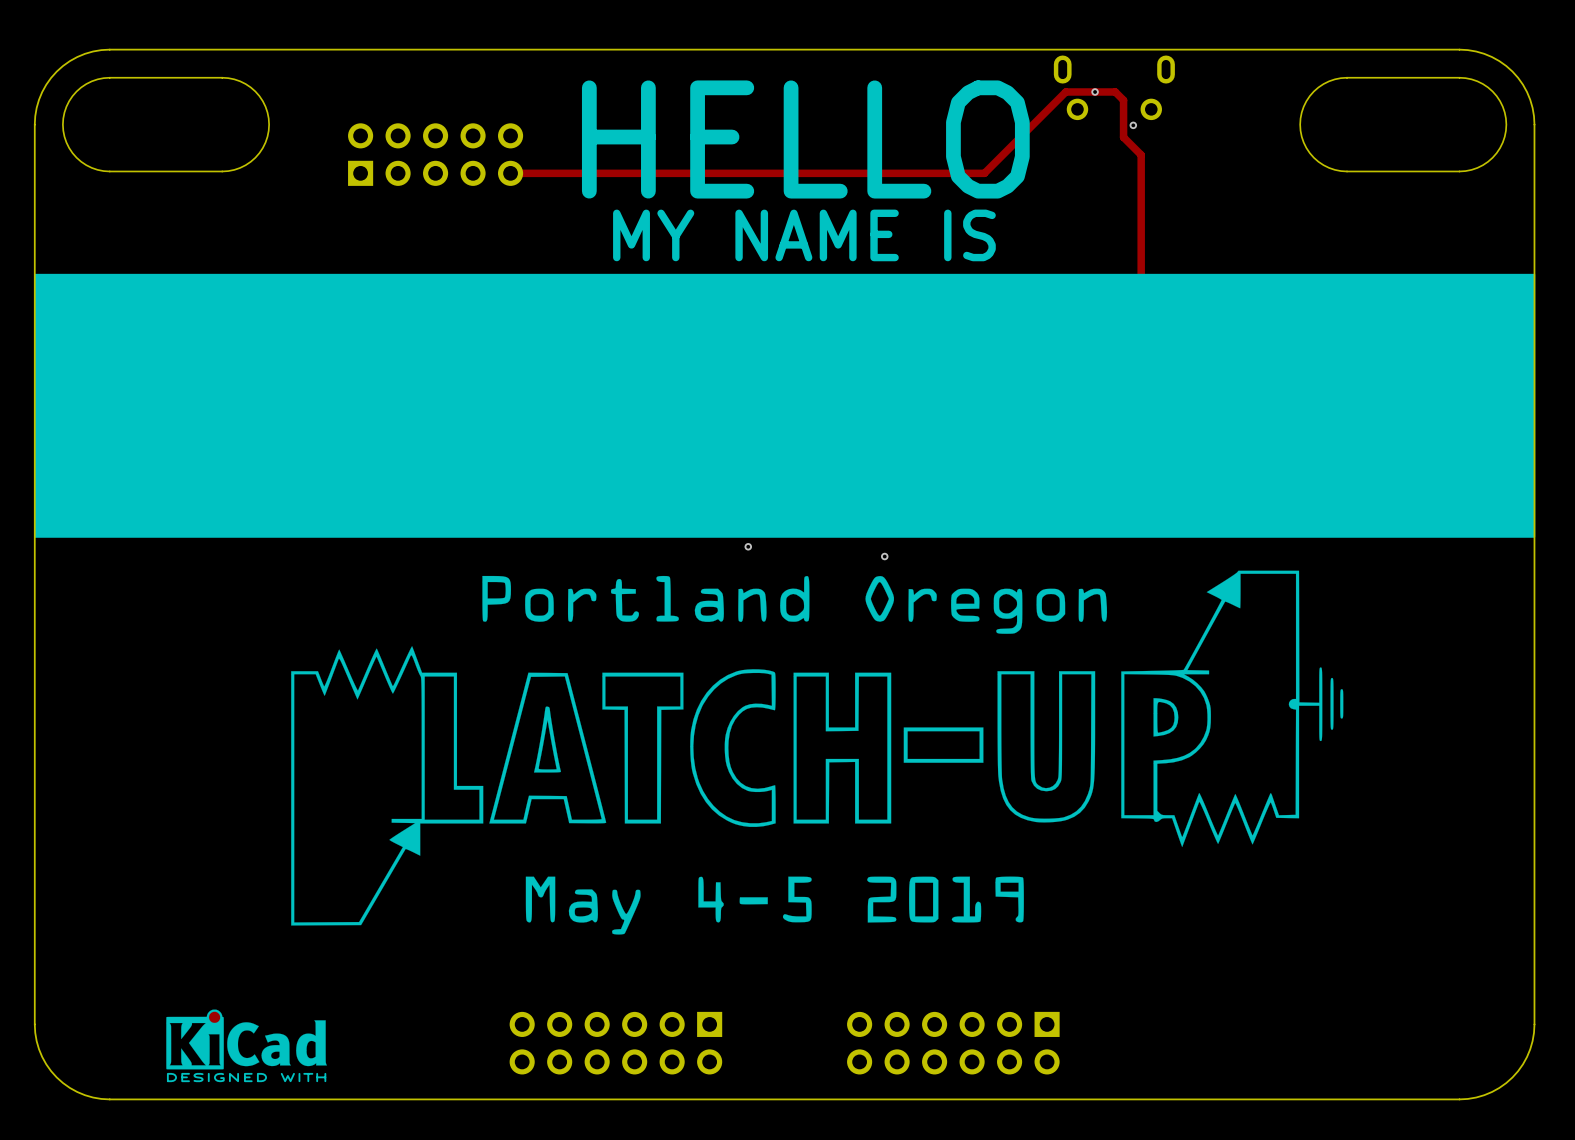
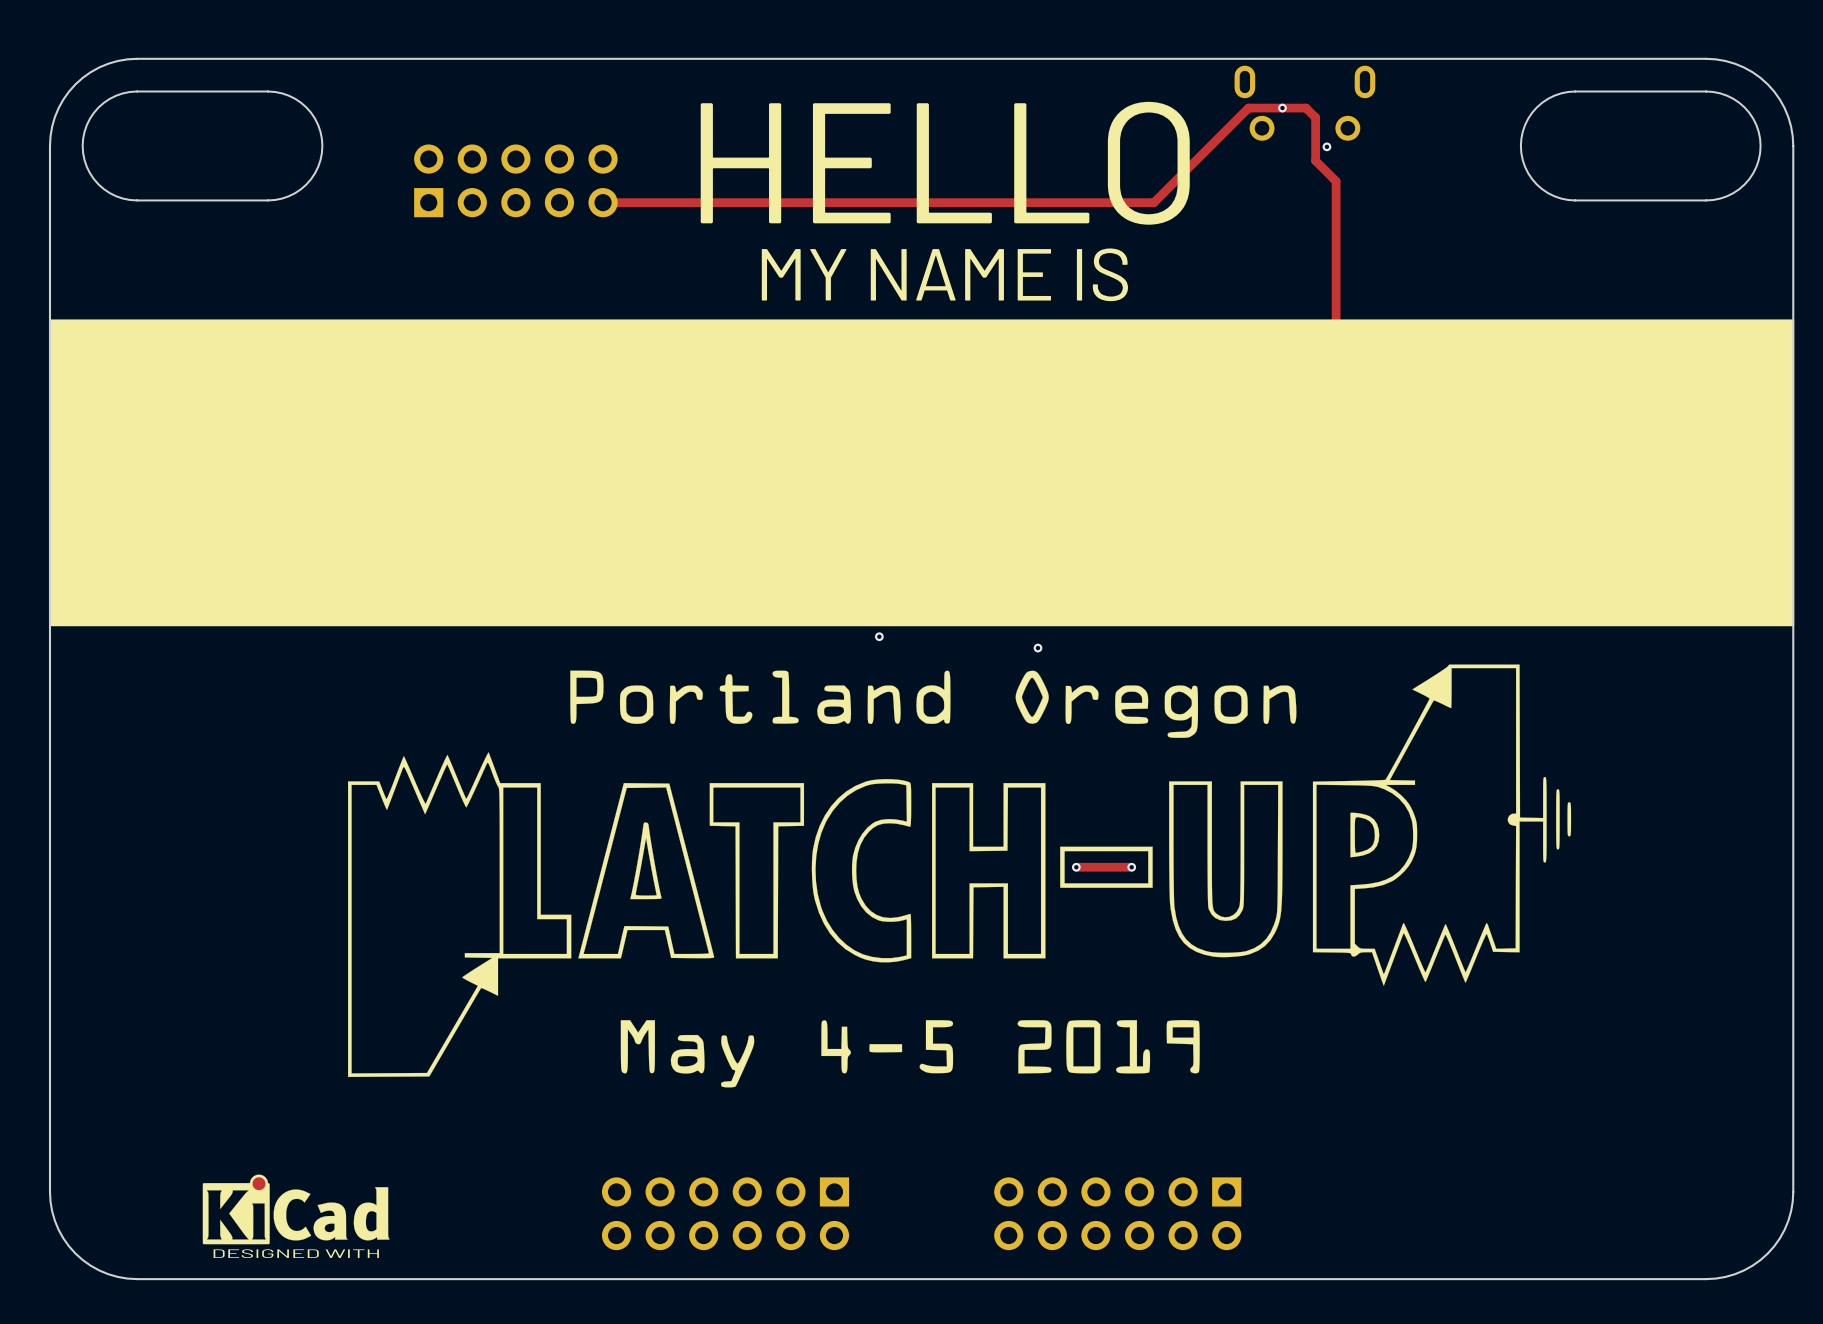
track: none -> (1076, 867) (1131, 867)
via: none -> (1076, 867)
via: none -> (1131, 867)

